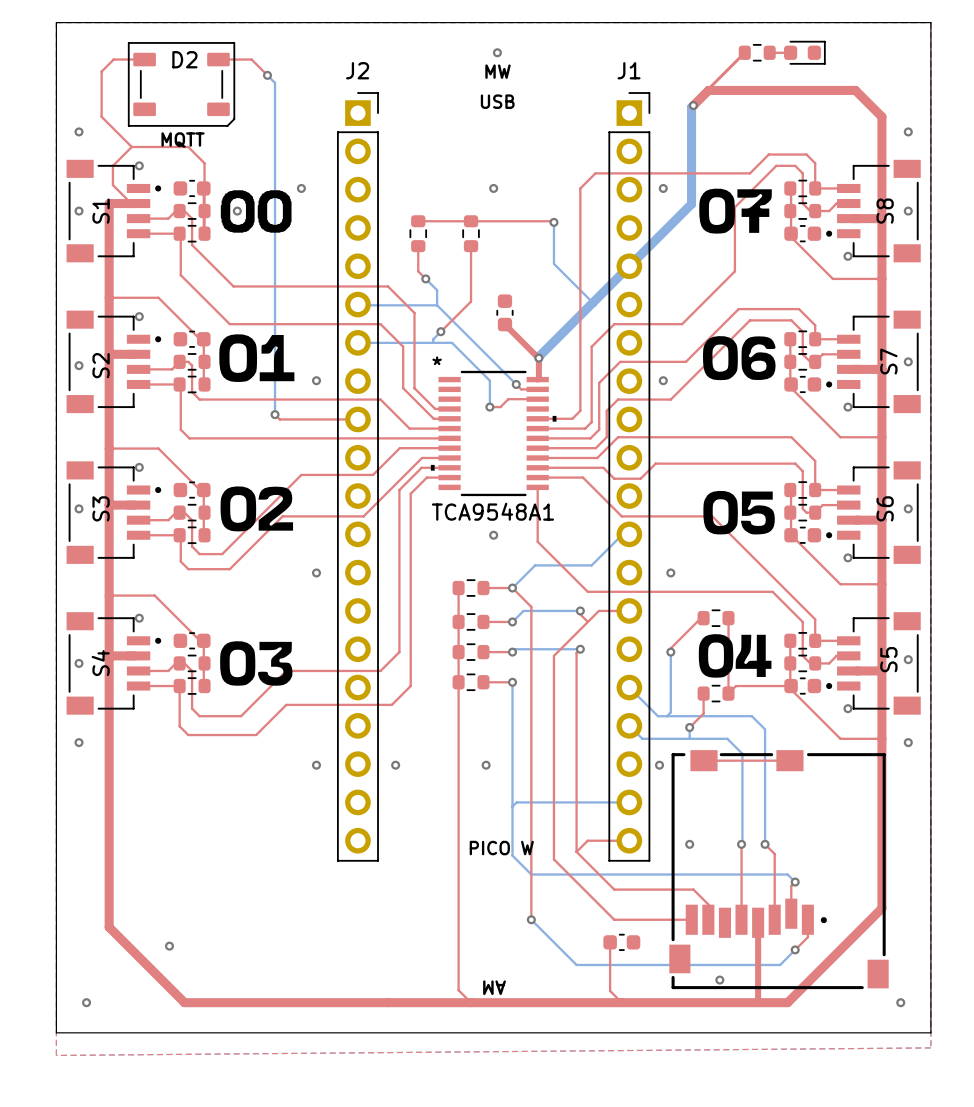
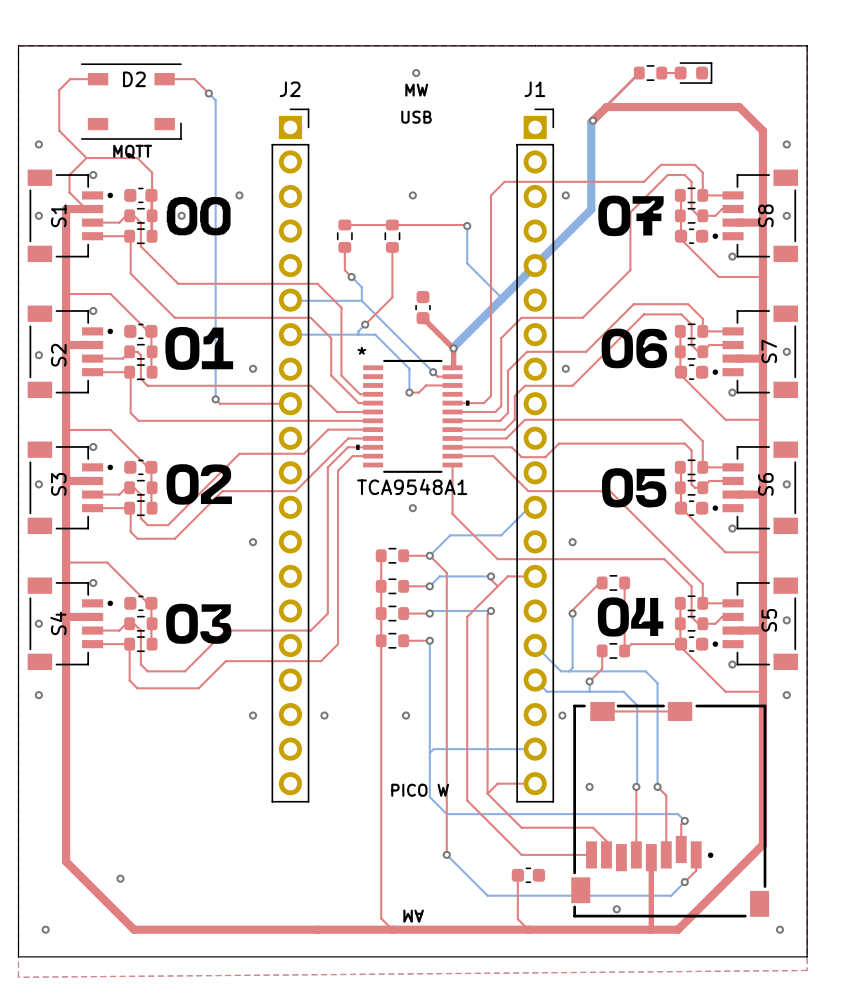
D2 footprint: [127, 42, 236, 127] -> [80, 63, 182, 140]

